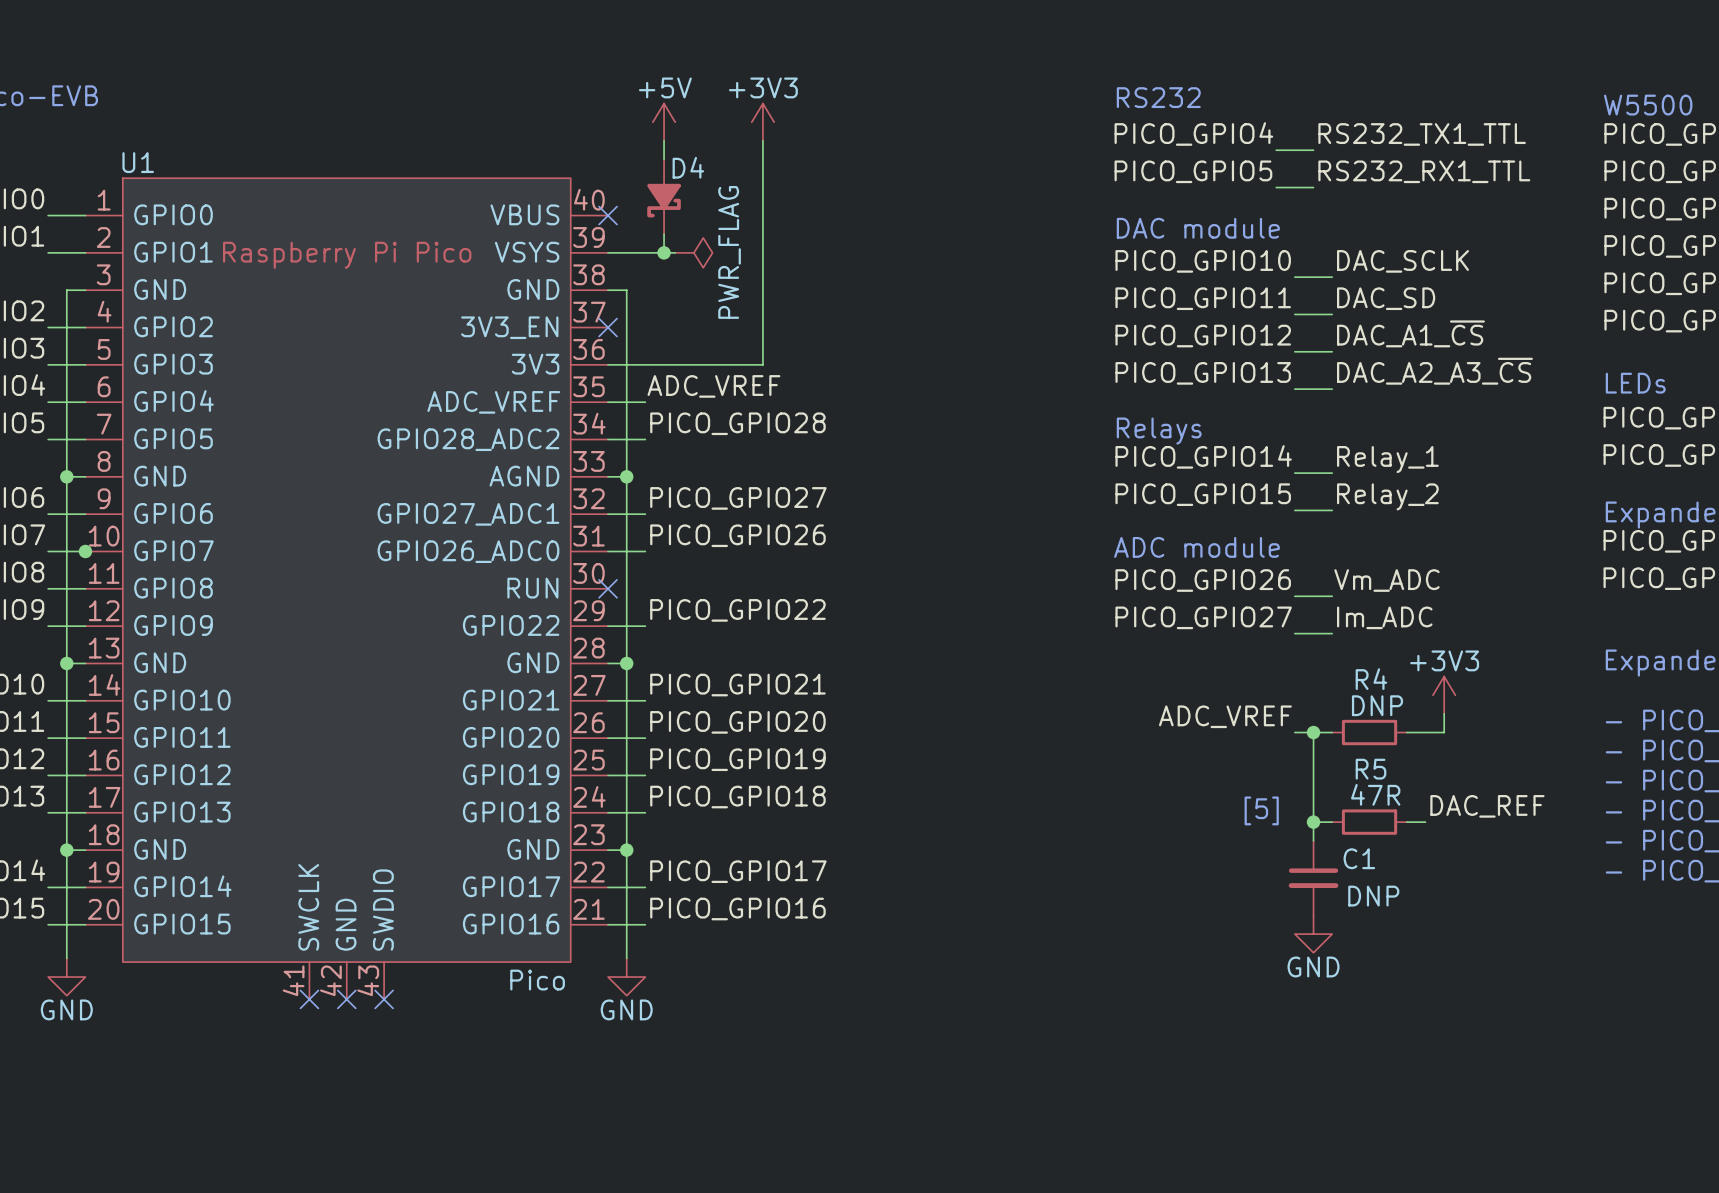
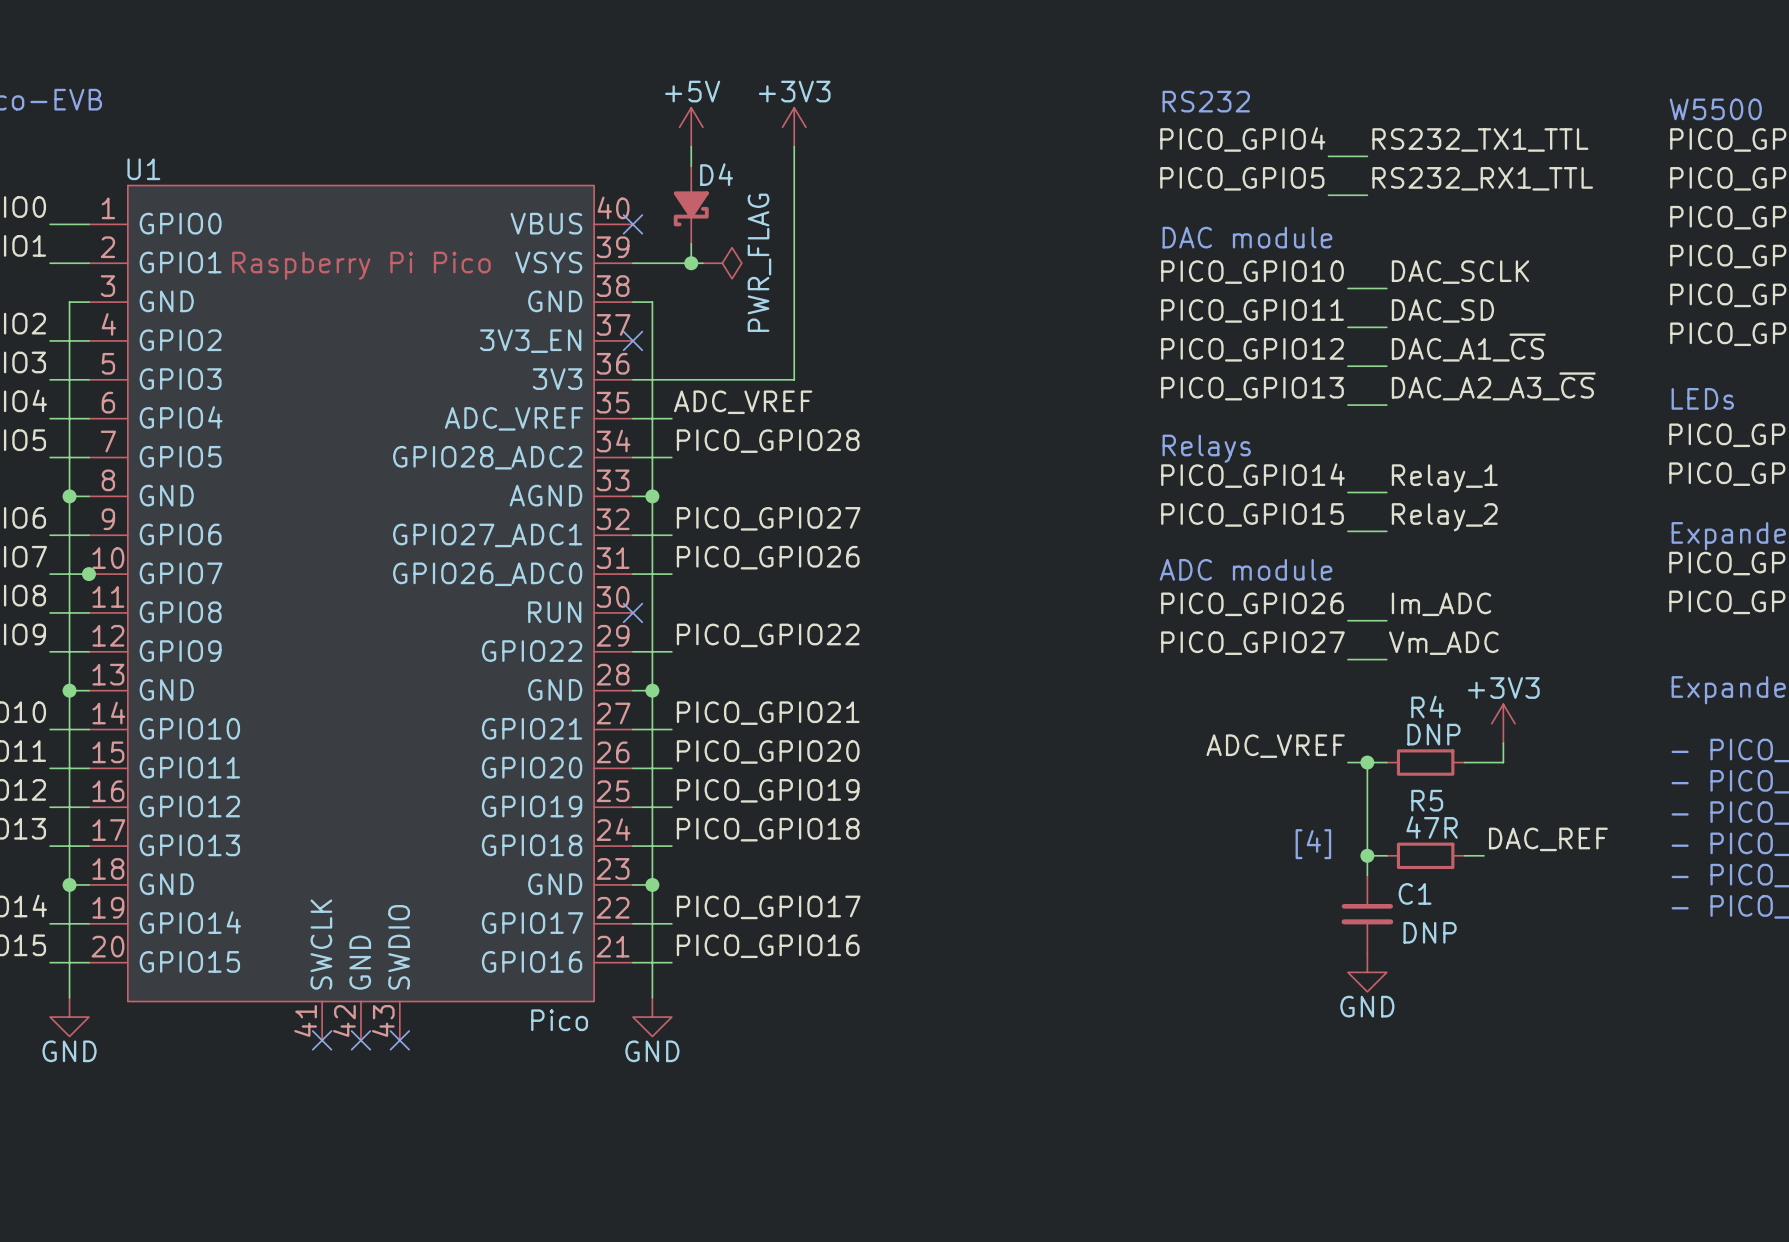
label: Vm_ADC (1386, 580) -> Im_ADC (1441, 604)
label: Im_ADC (1384, 617) -> Vm_ADC (1443, 643)
text: [5] (1261, 810) -> [4] (1313, 844)

